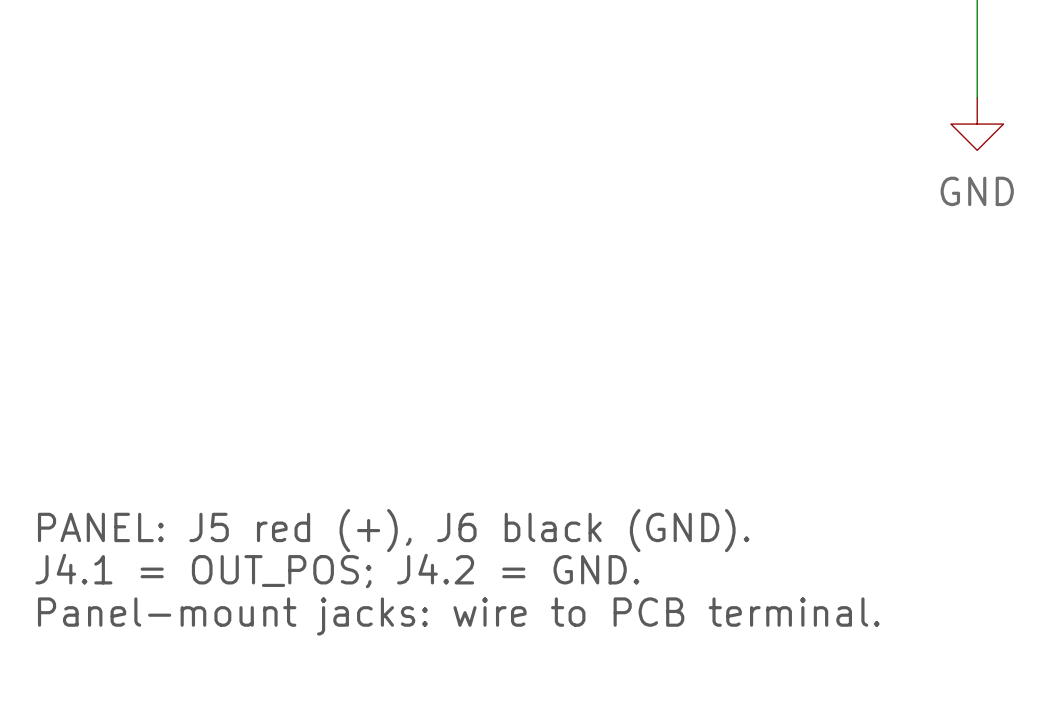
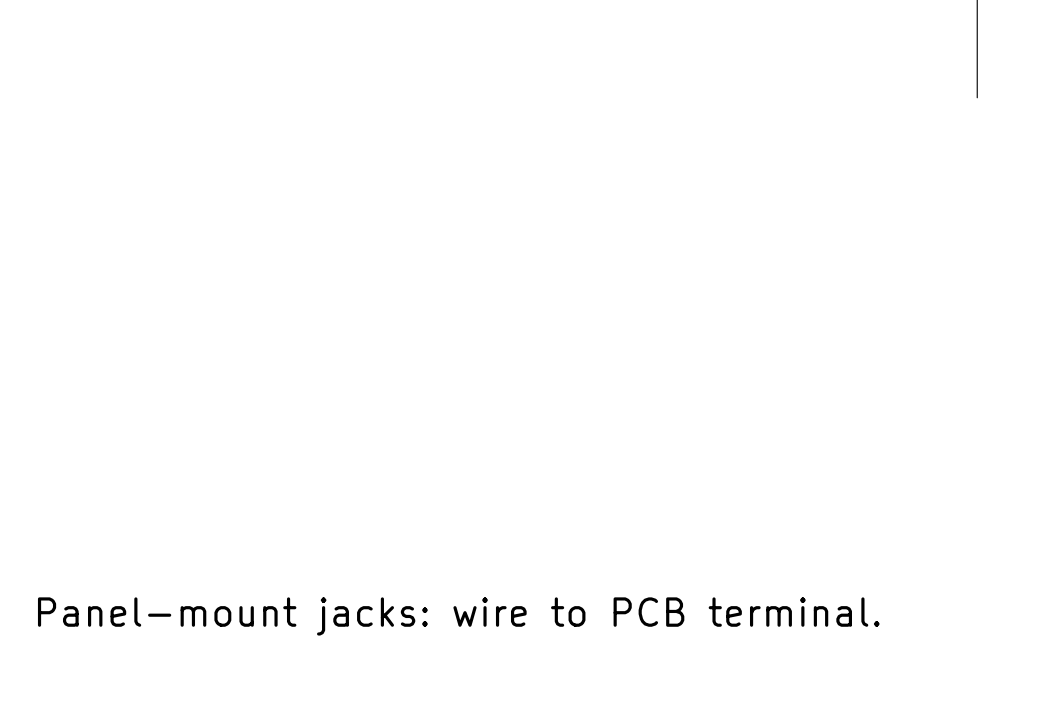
power symbol: GND (977, 124) -> none
text: PANEL: J5 red (+), J6 black (GND). (393, 530) -> none
text: J4.1 = OUT_POS; J4.2 = GND. (337, 571) -> none

